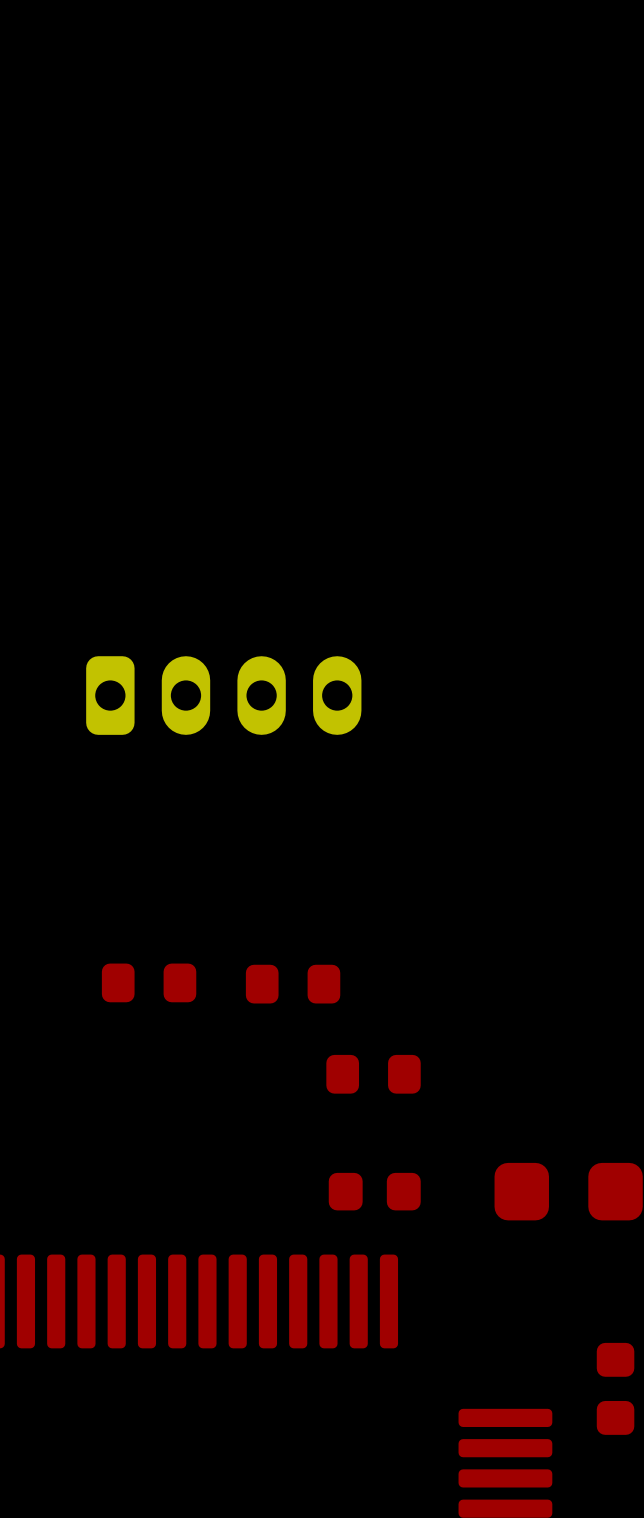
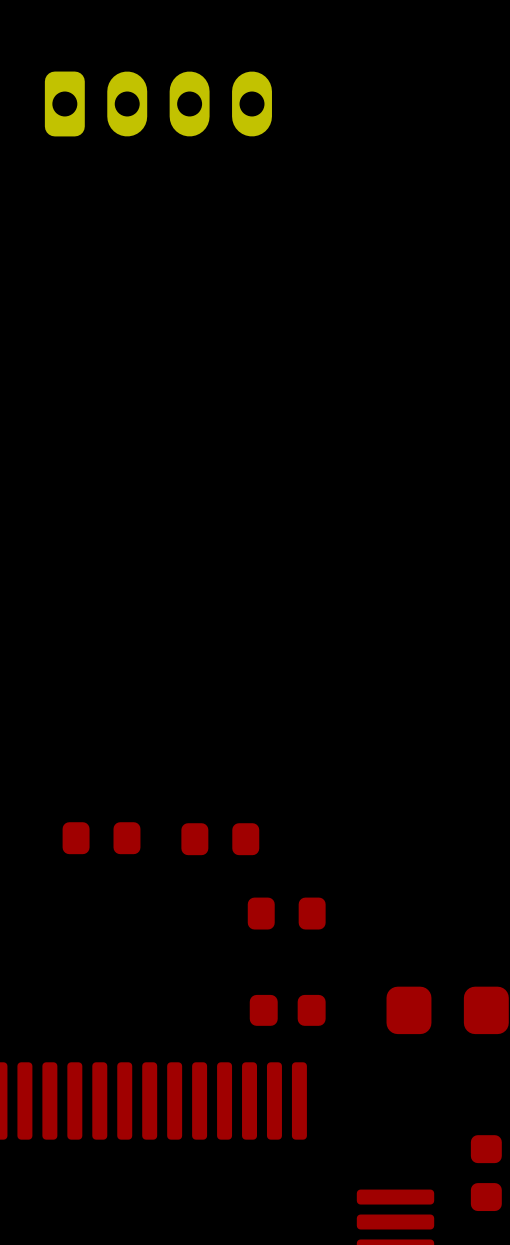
part position: (223, 695) -> (158, 103)

